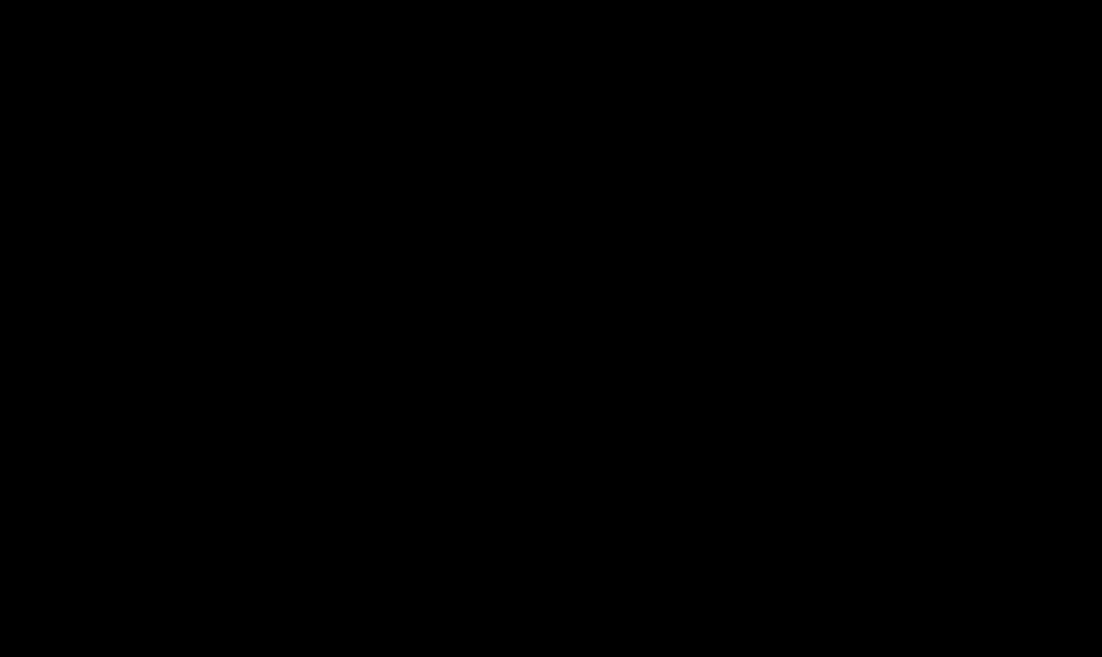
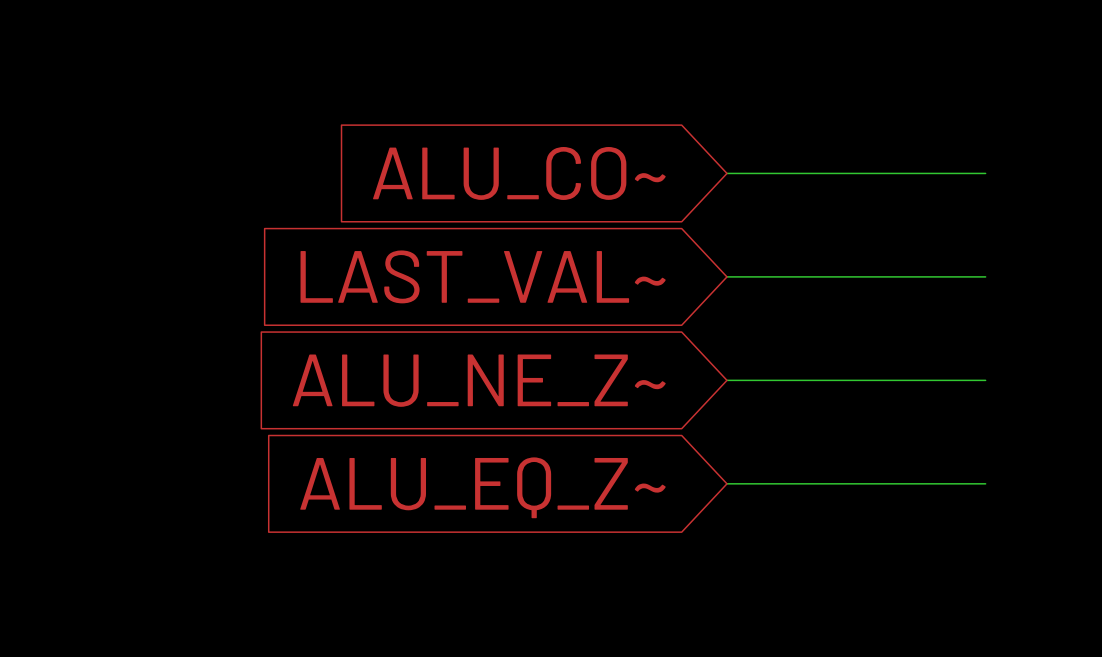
global label: none -> ALU_CO~ (519, 173)
wire: none -> (726, 173) (985, 173)
global label: none -> LAST_VAL~ (483, 276)
wire: none -> (726, 276) (985, 276)
global label: none -> ALU_NE_Z~ (479, 380)
wire: none -> (726, 380) (985, 380)
wire: none -> (726, 483) (985, 483)
global label: none -> ALU_EQ_Z~ (482, 487)

